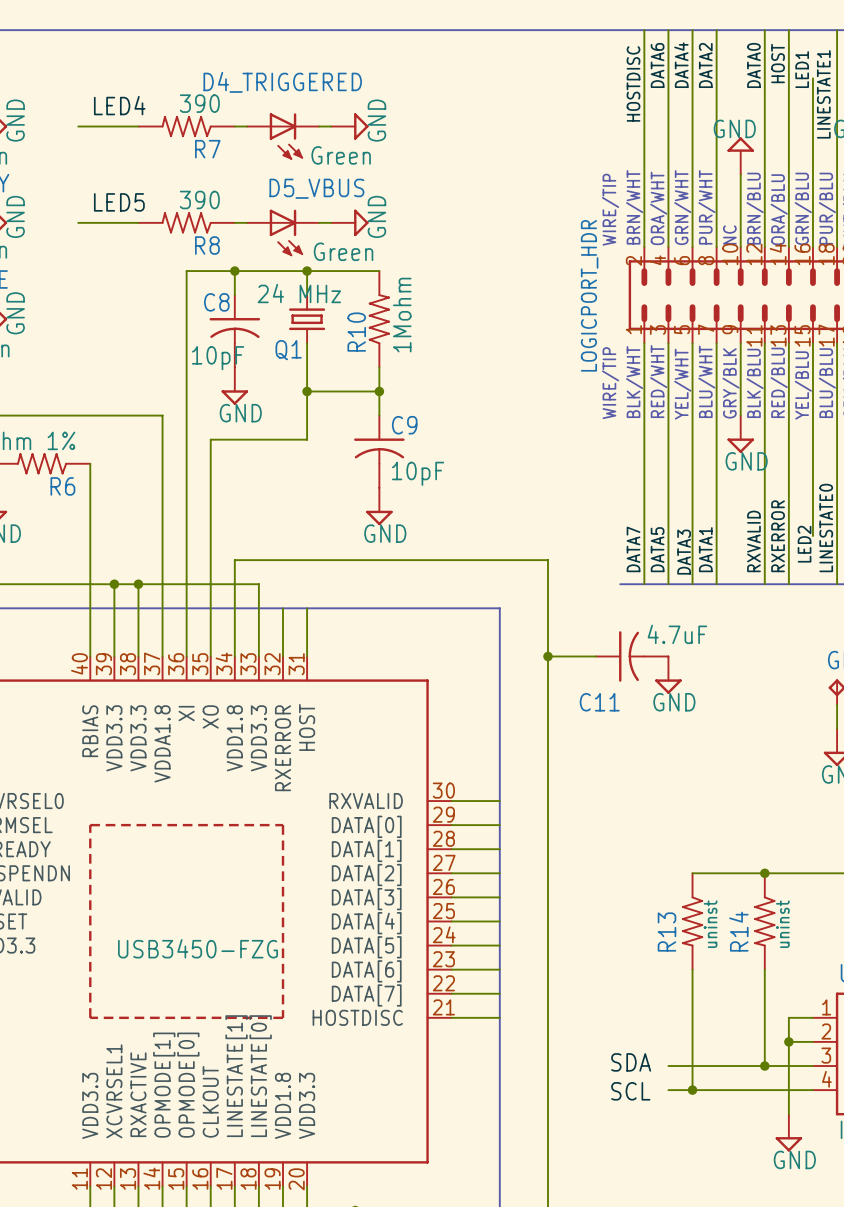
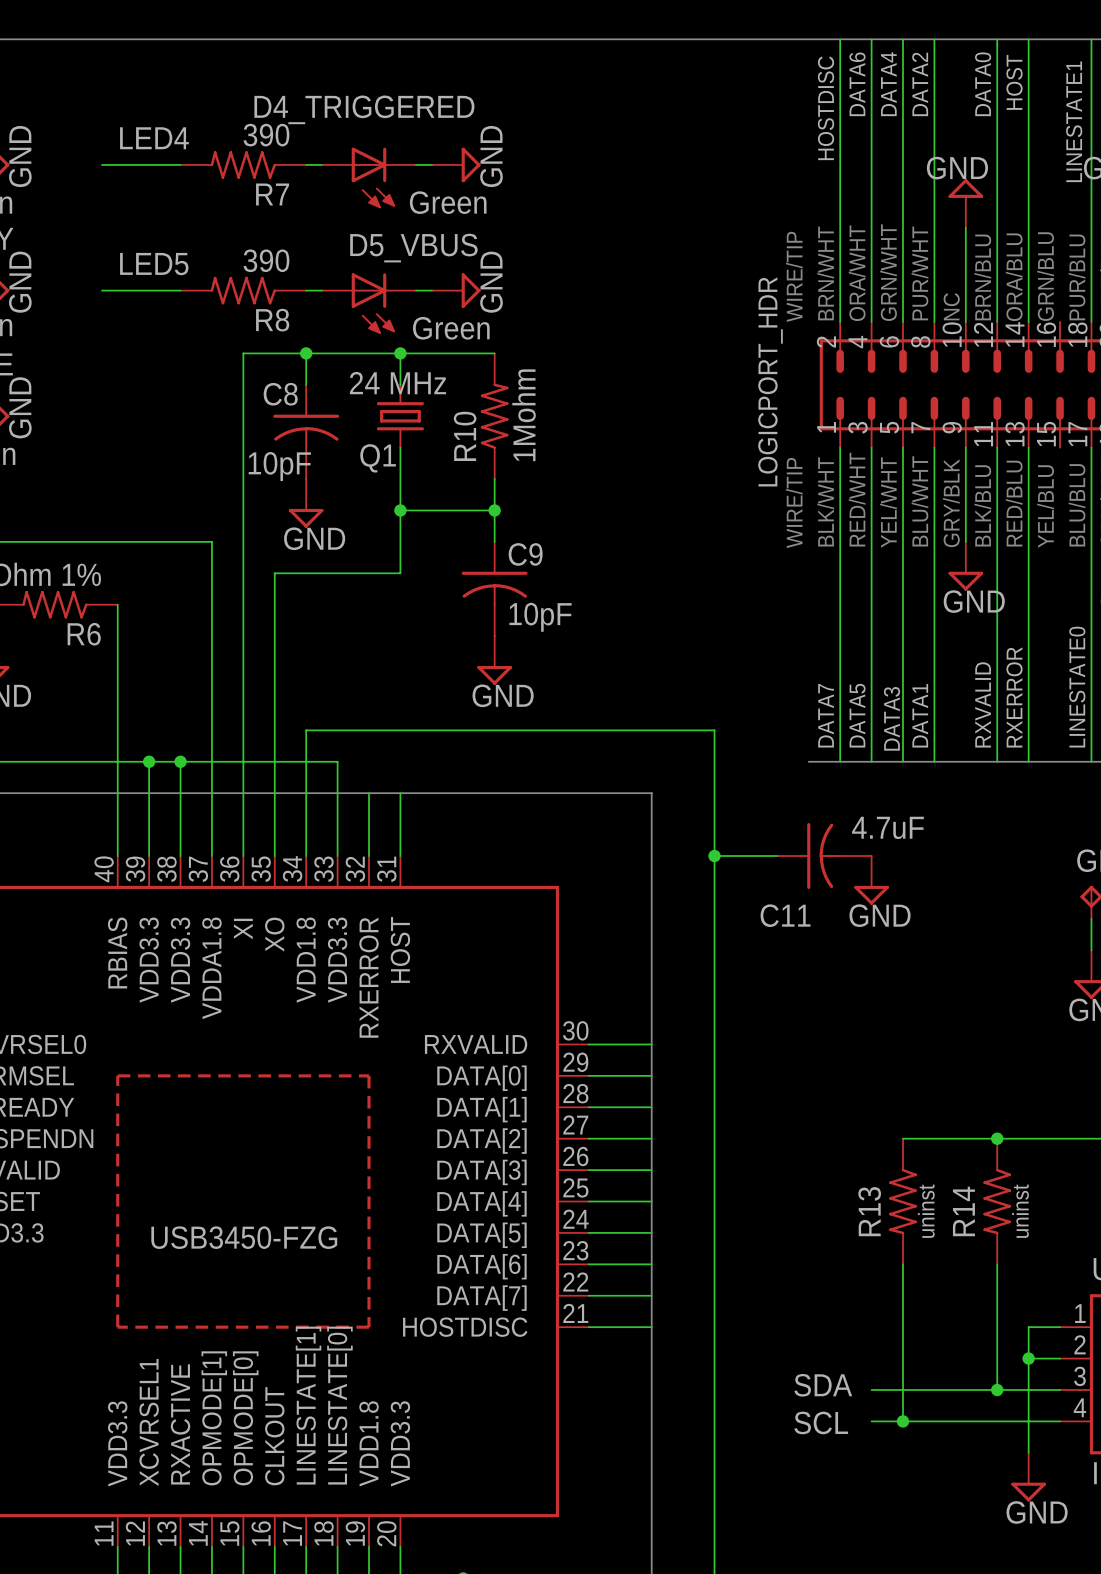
label: LED1 (802, 69) -> none
wire: (812, 78) (812, 246) -> none
wire: (812, 343) (812, 536) -> none
label: LED2 (804, 544) -> none

